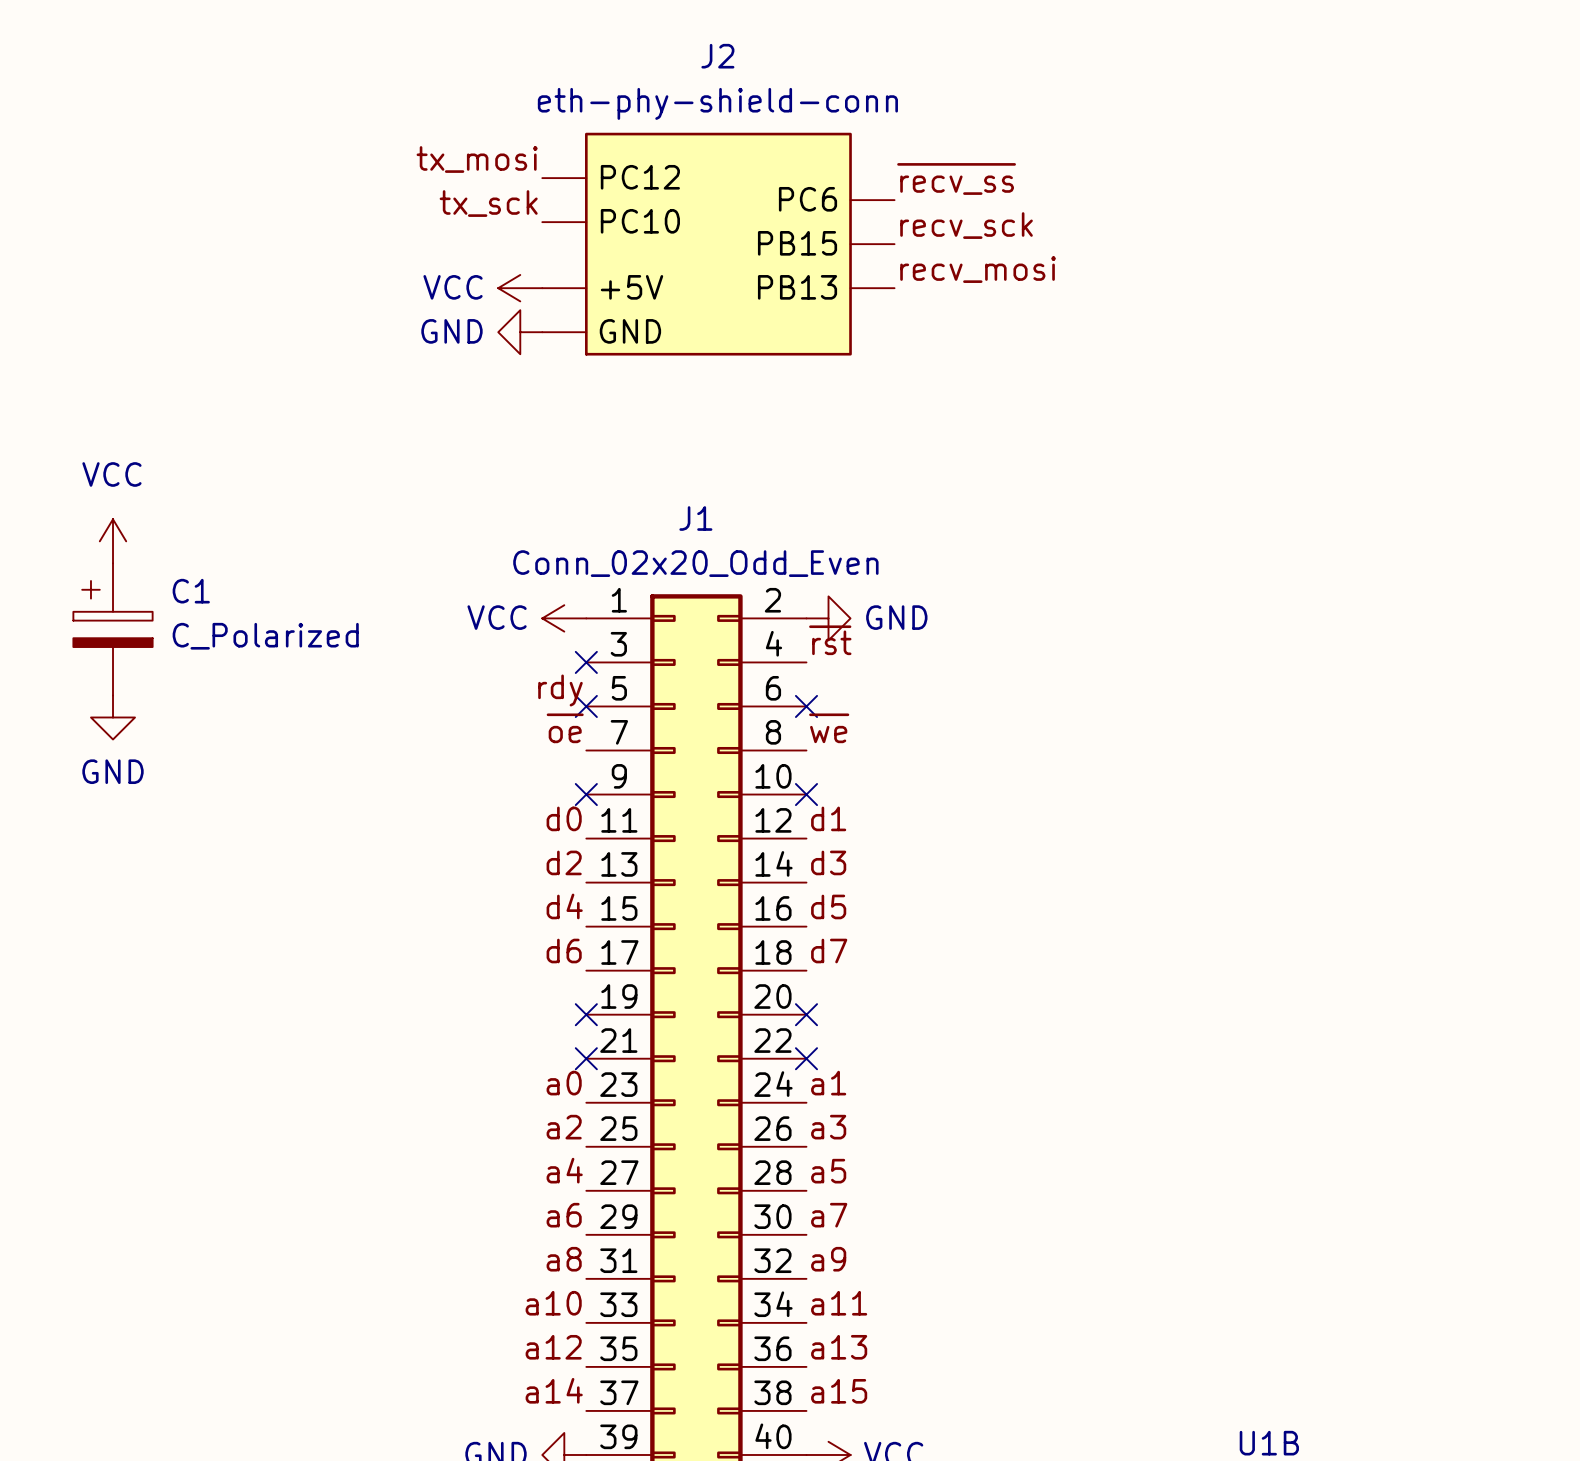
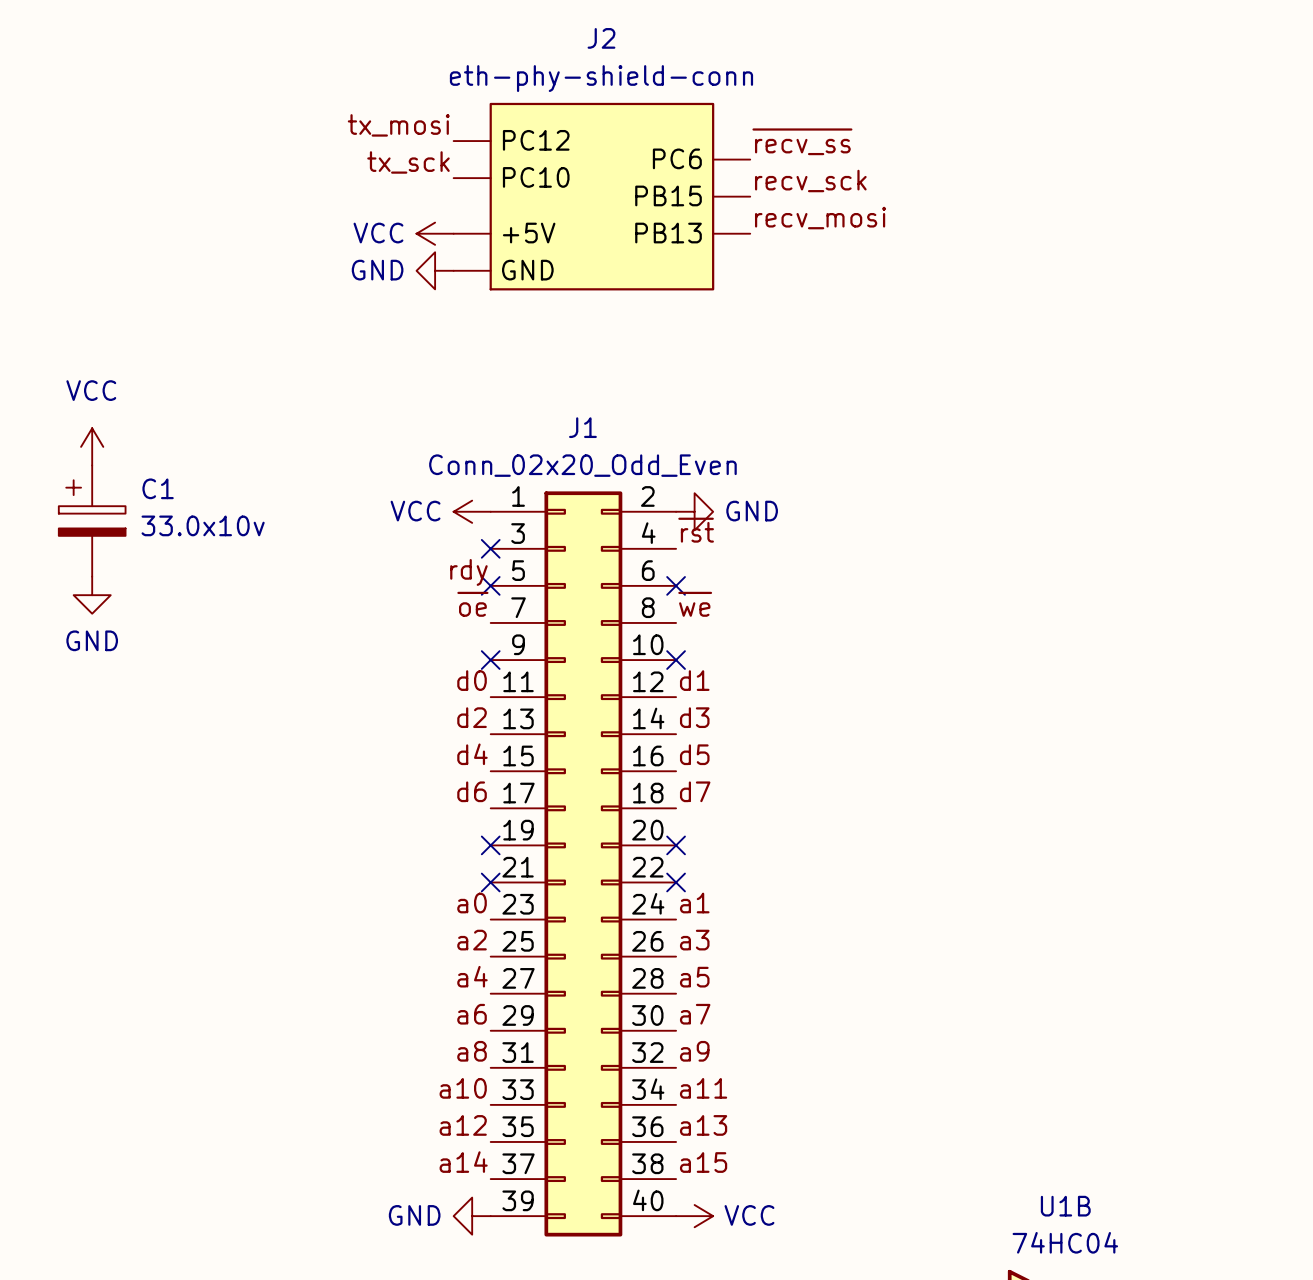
C1 value: C_Polarized (265, 636) -> 33.0x10v (203, 525)

